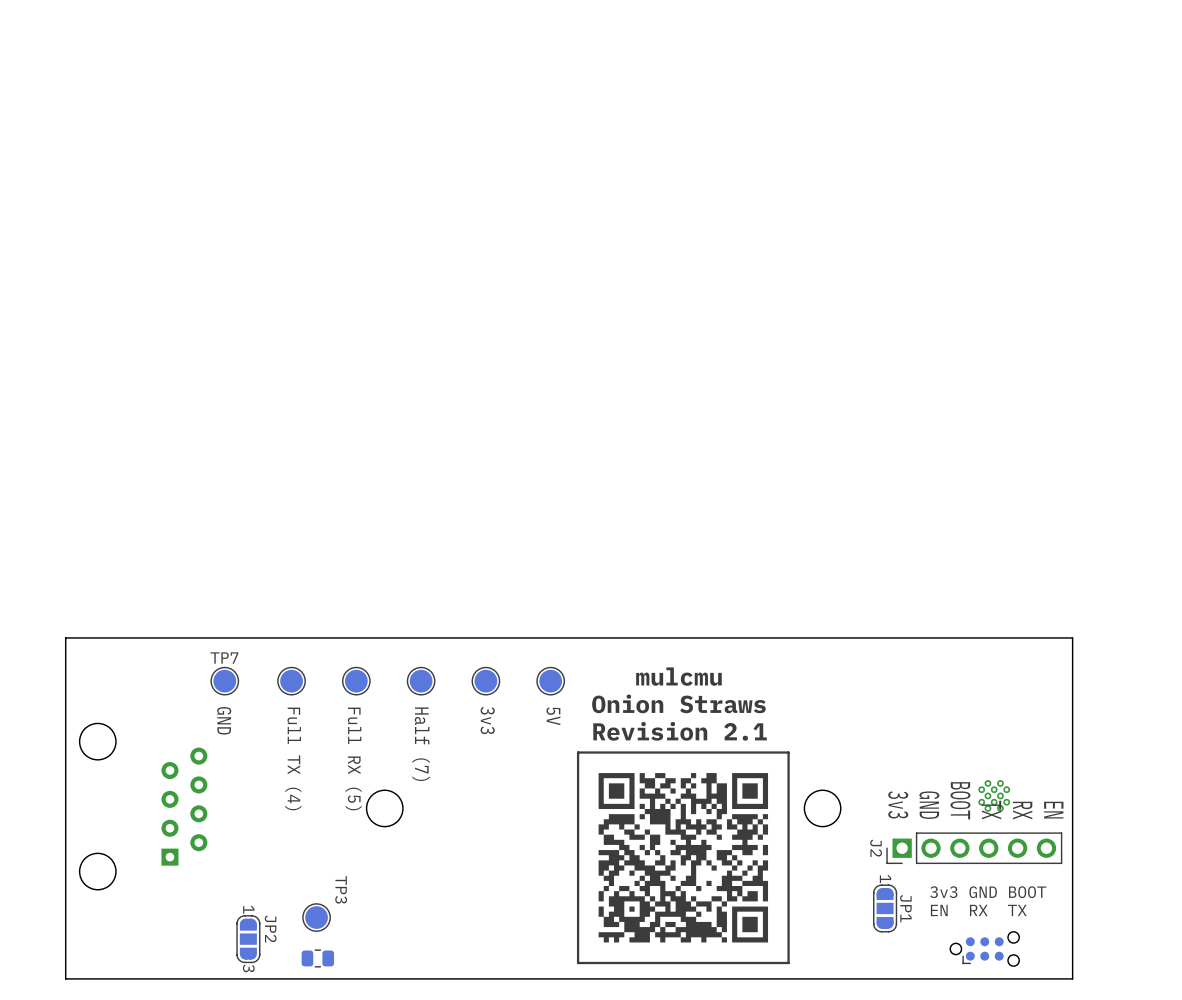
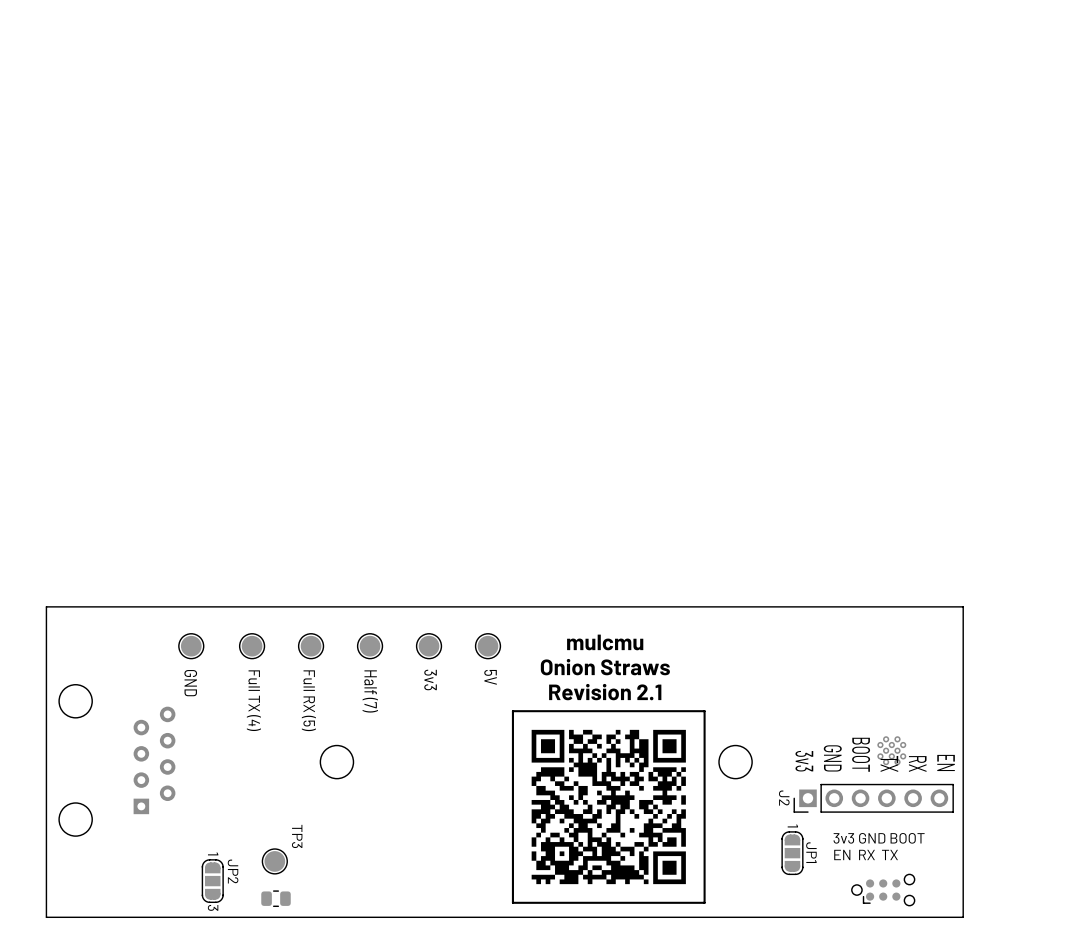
TP7 name: TP7 (224, 658) -> none

